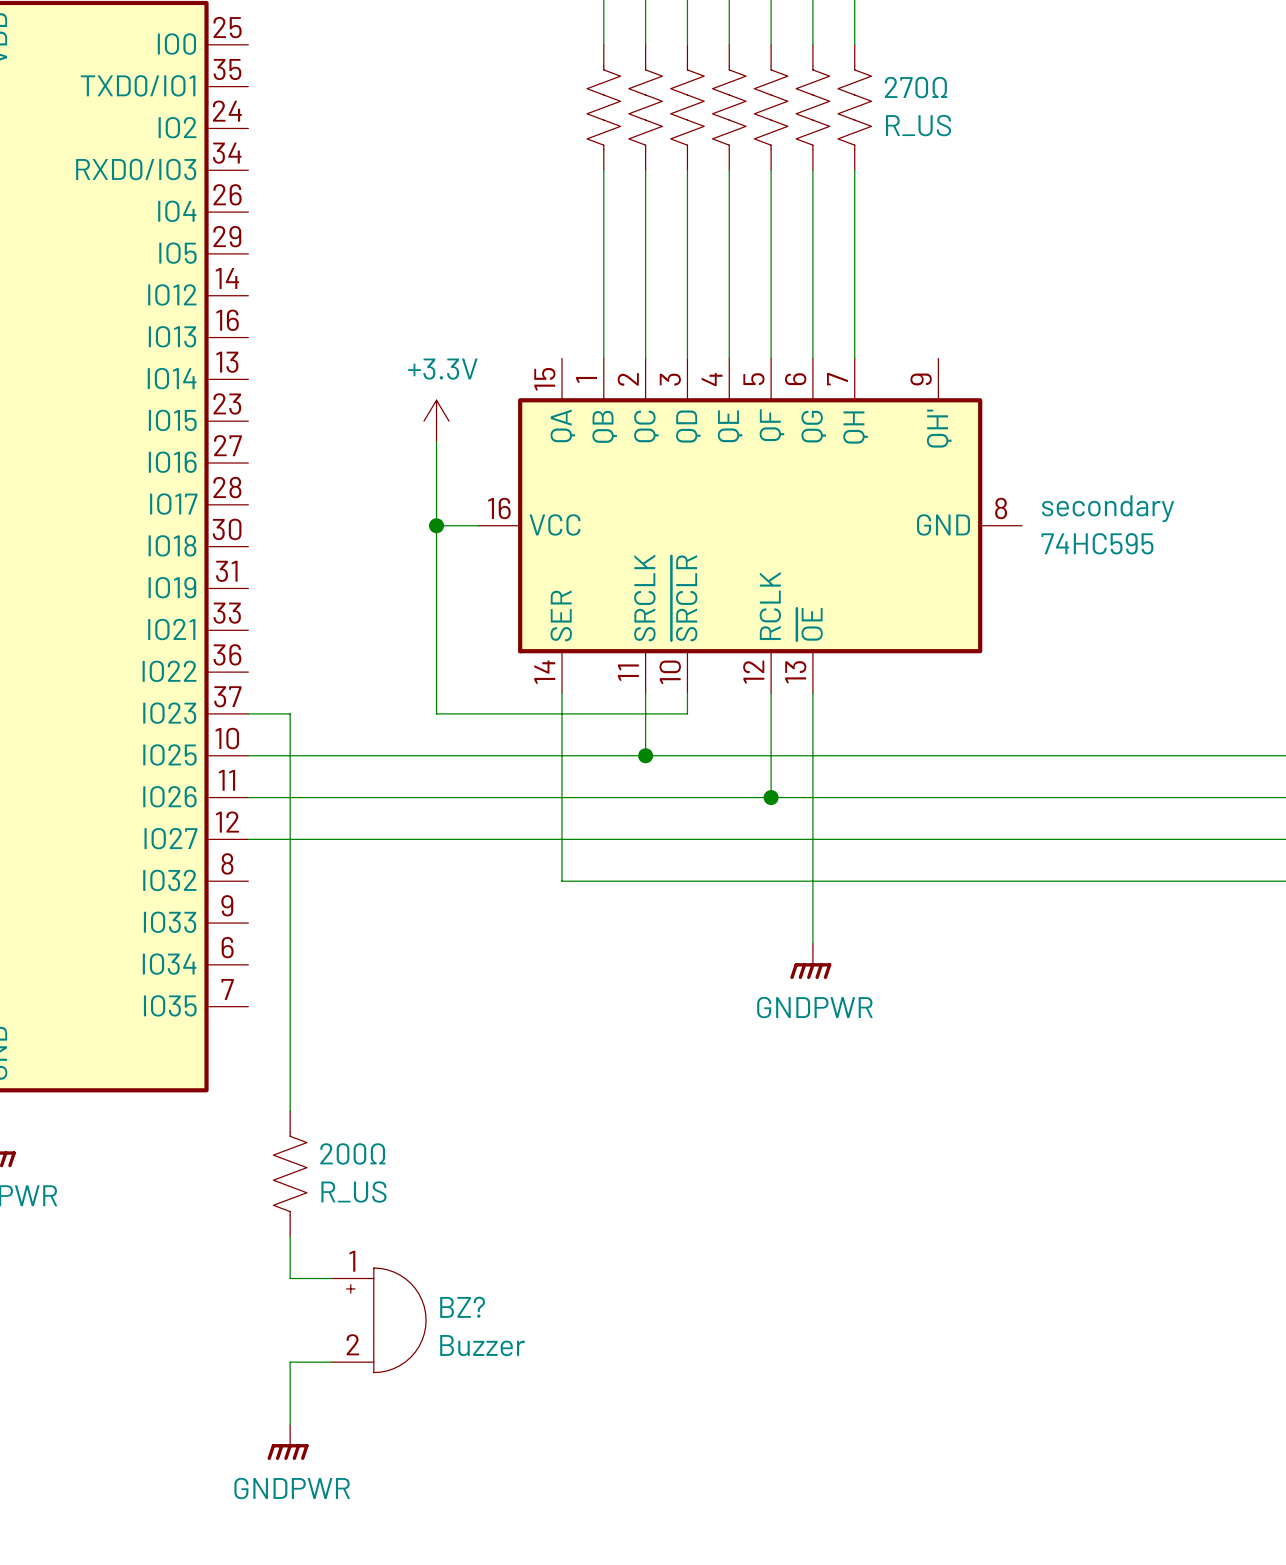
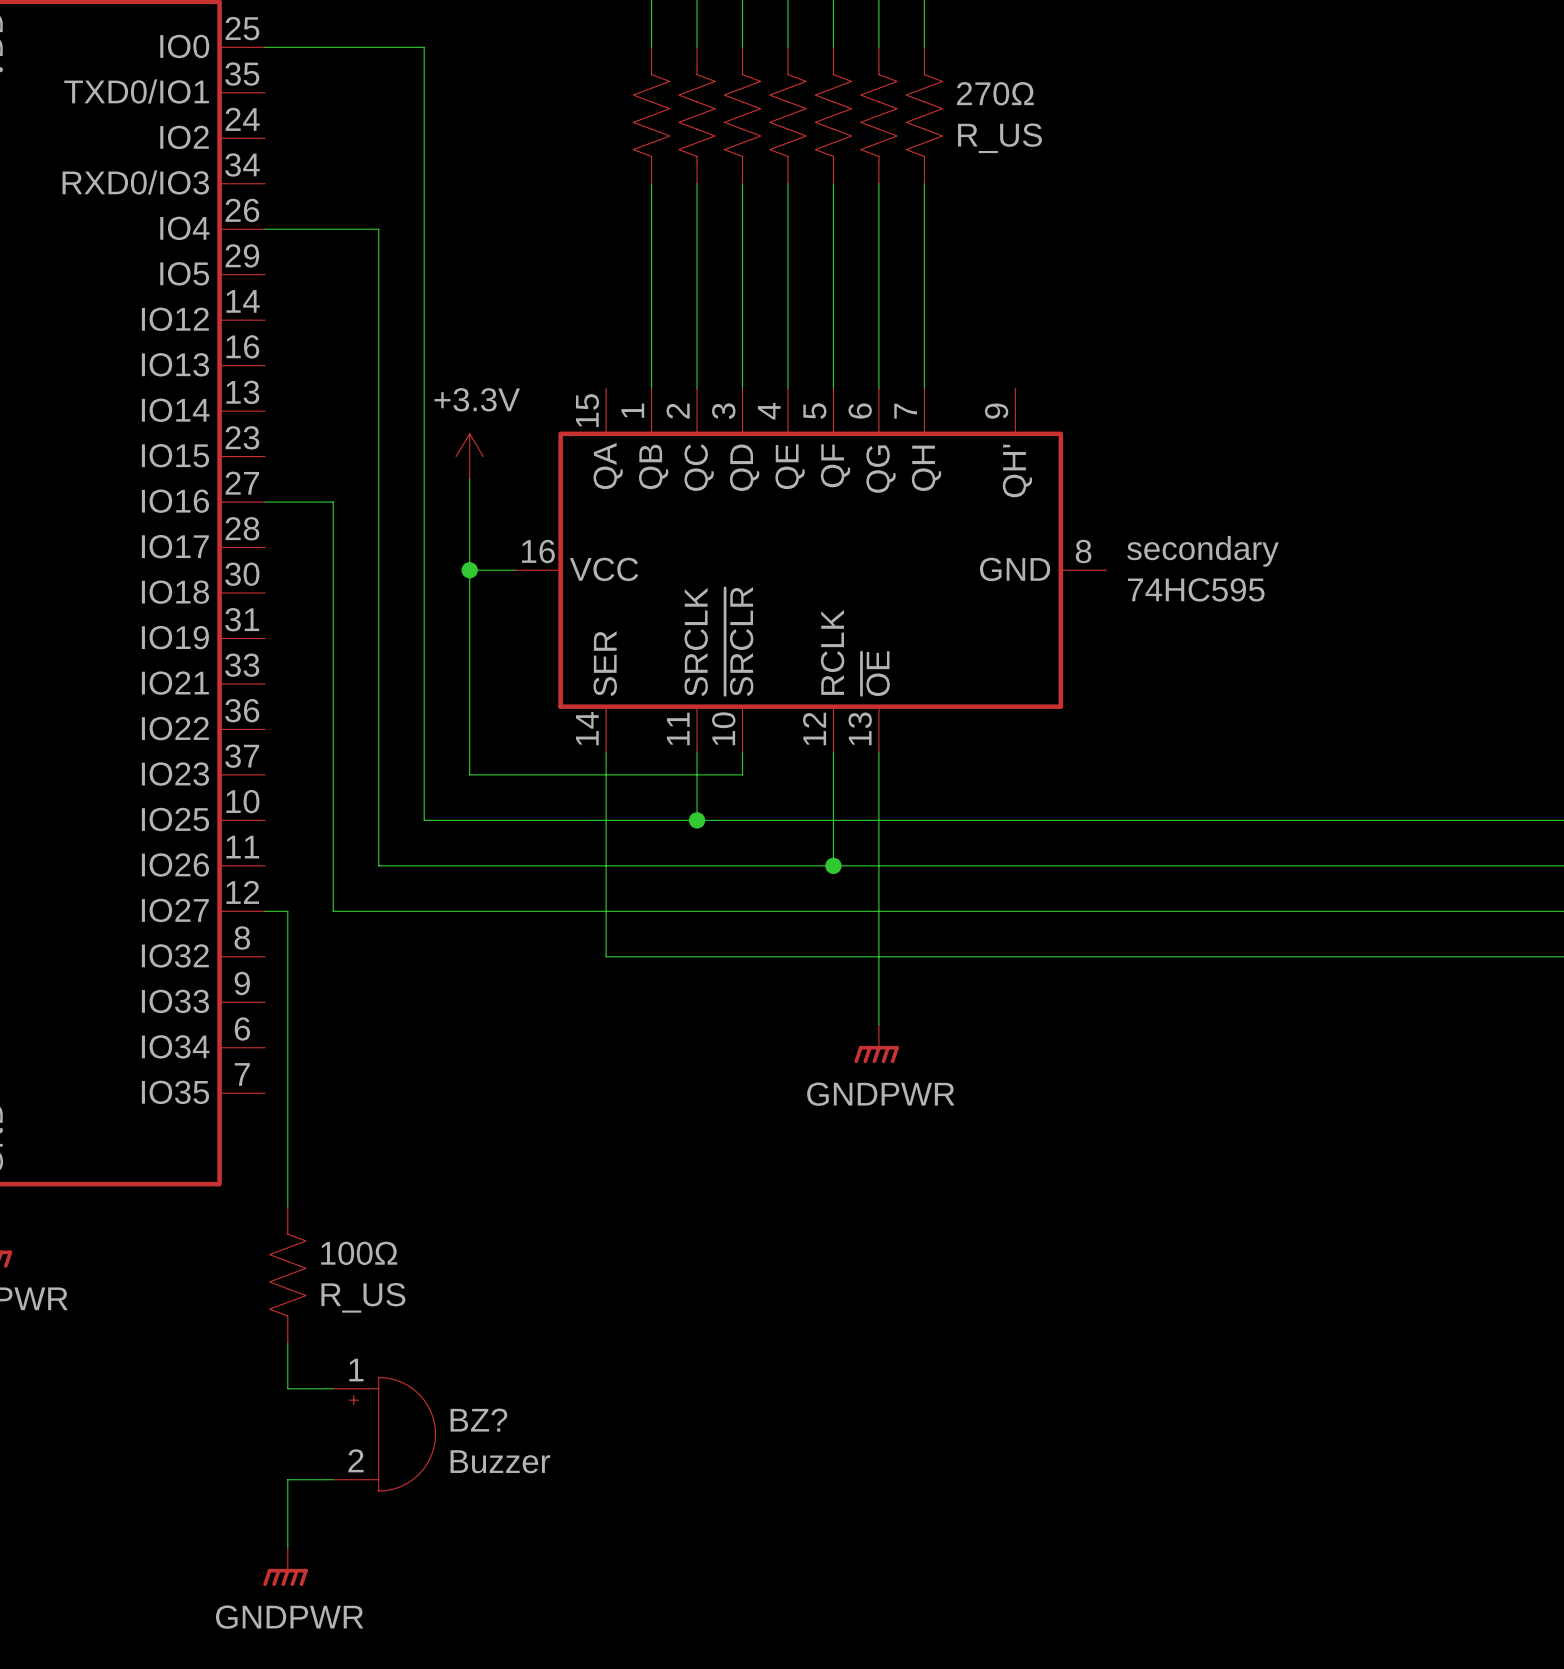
wire: none -> (265, 502) (333, 502) (333, 911)
wire: (248, 713) (290, 713) (290, 1111) -> none
wire: (248, 755) (394, 755) -> (265, 47) (424, 47) (424, 820)
wire: (248, 797) (352, 797) -> (265, 229) (378, 229) (378, 865)
wire: (269, 839) (311, 839) -> (287, 911) (287, 1206)
100Ω: none -> R_US (287, 1275)
200Ω: R_US (290, 1173) -> none
wire: (290, 1236) (290, 1278) -> (287, 1343) (287, 1388) (310, 1388)
BZ? position: (379, 1320) -> (384, 1434)
wire: (290, 1362) (290, 1424) -> (310, 1479) (287, 1479) (287, 1547)
power symbol position: GNDPWR (288, 1442) -> GNDPWR (285, 1567)

